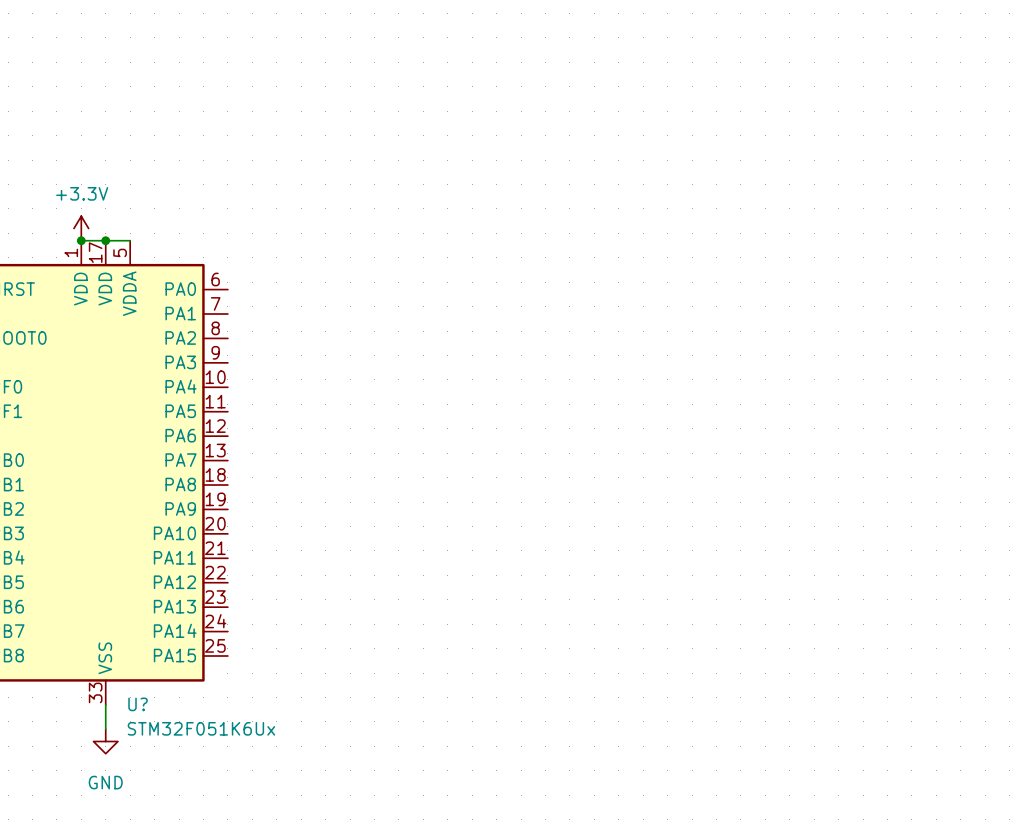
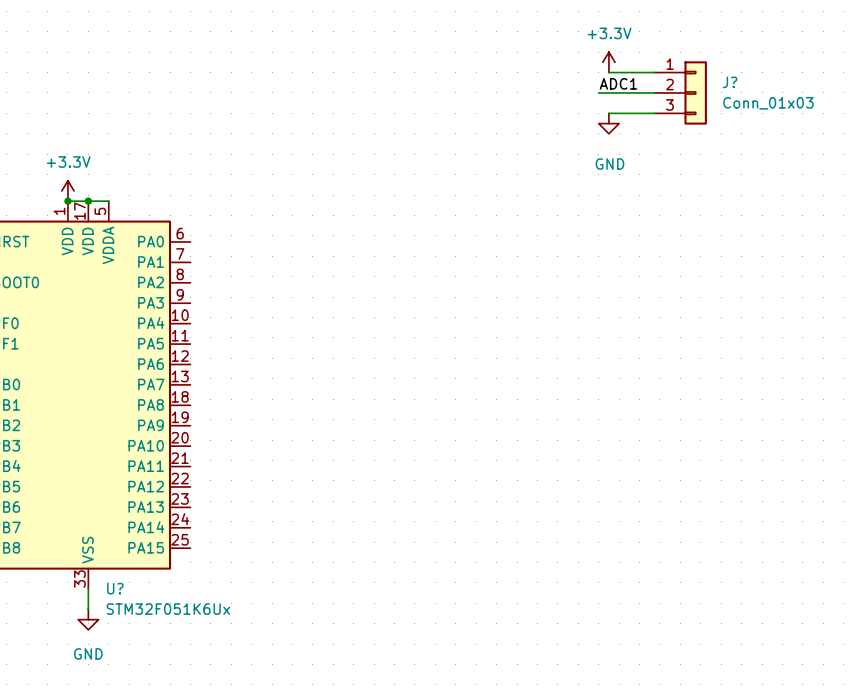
power symbol: none -> +3.3V (608, 62)
wire: none -> (608, 72) (654, 72)
label: none -> ADC1 (618, 83)
wire: none -> (598, 92) (654, 92)
J?: none -> Conn_01x03 (680, 92)
wire: none -> (608, 113) (654, 113)
power symbol: none -> GND (608, 123)

